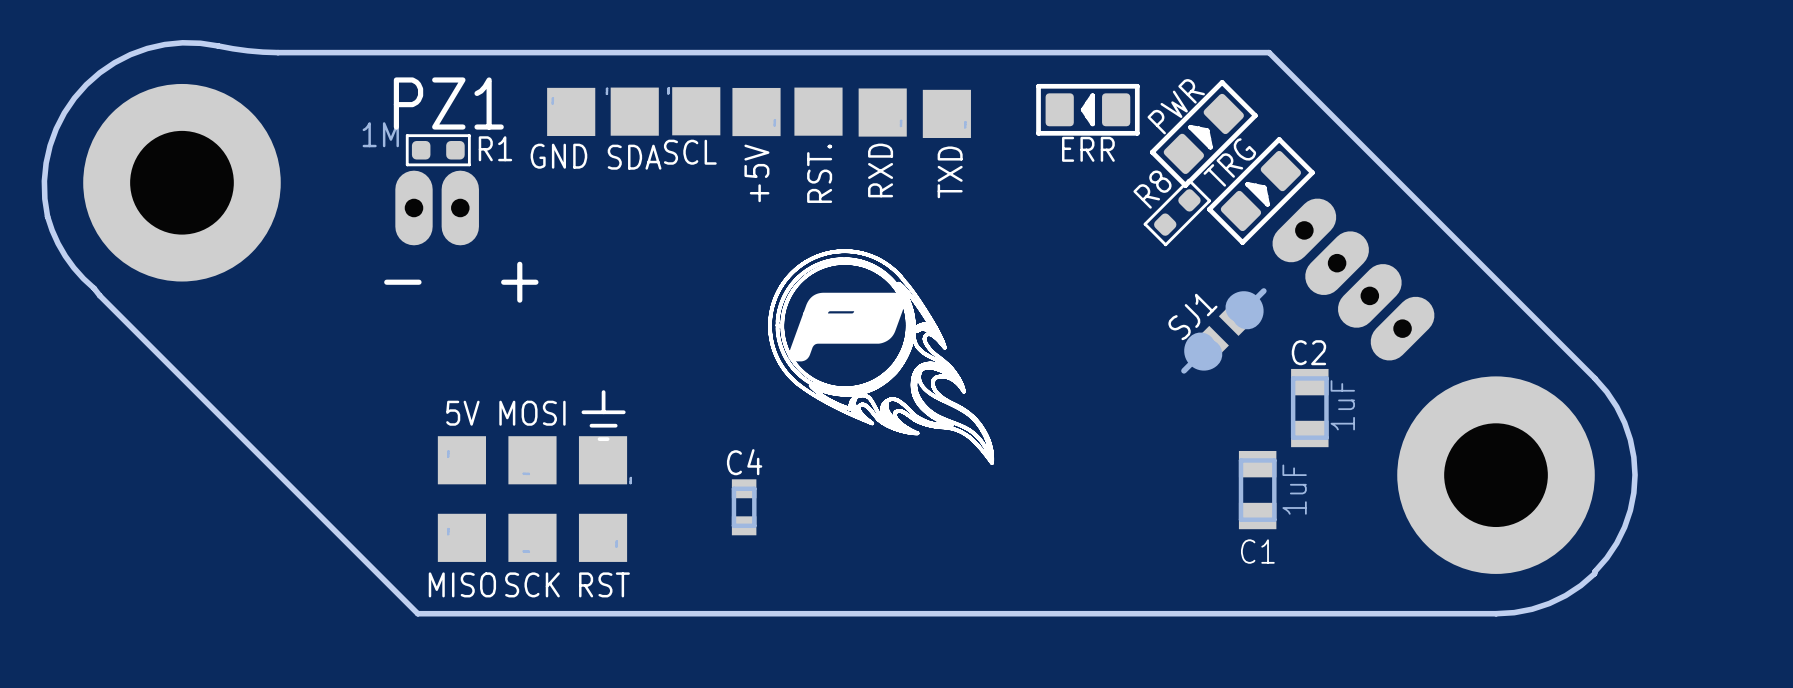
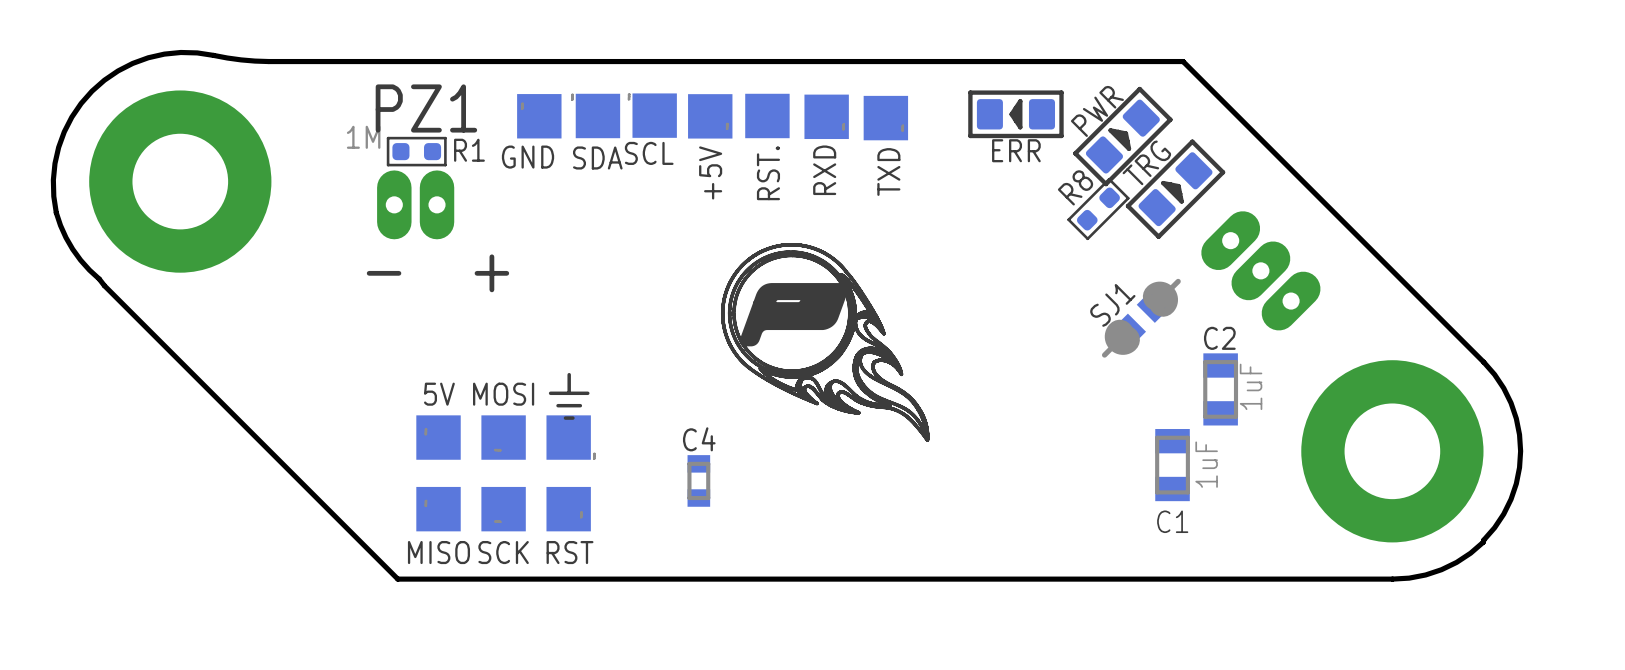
part footprint: [1272, 198, 1435, 361] -> [1201, 211, 1321, 331]

